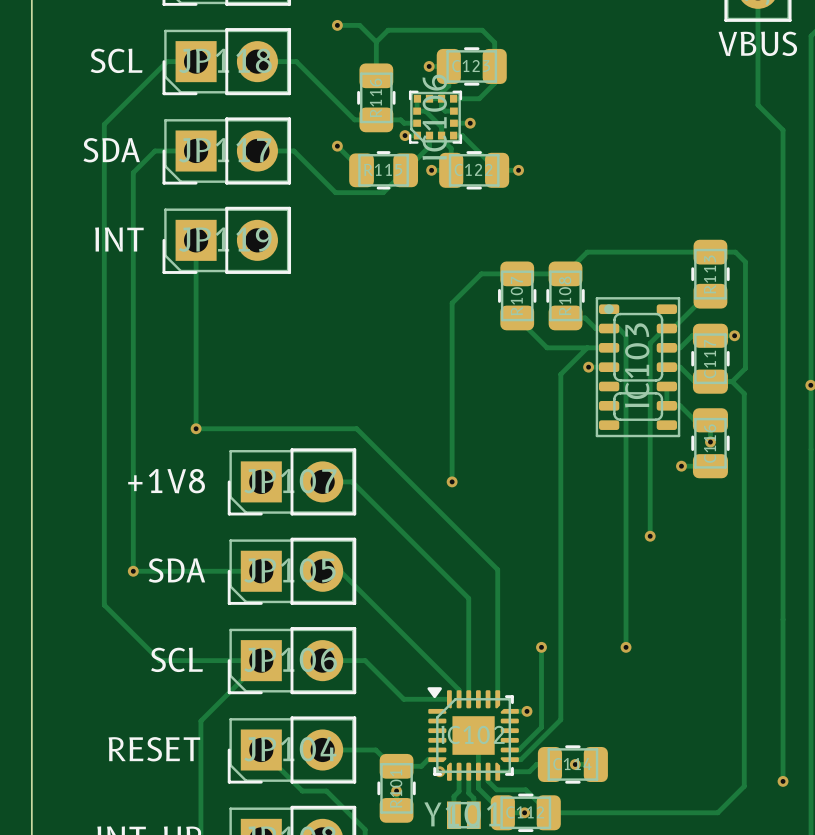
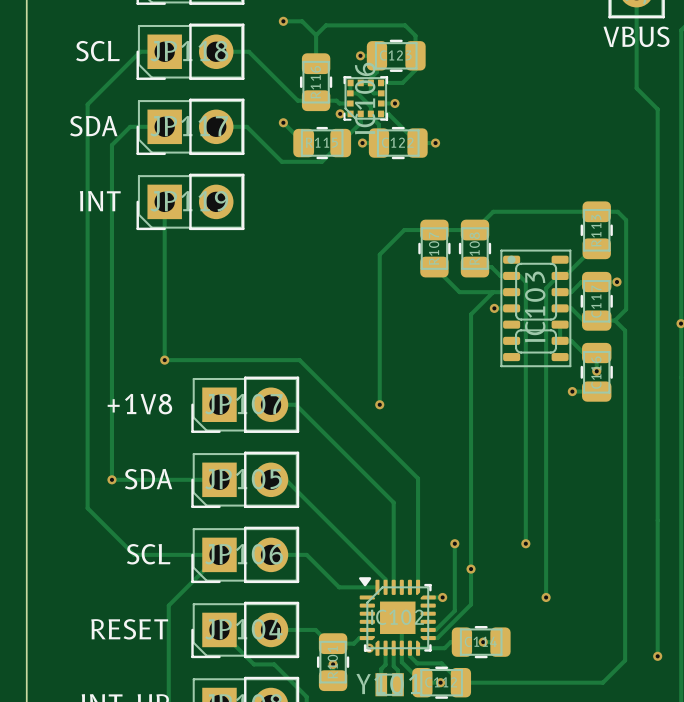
track: none -> (546, 450) (546, 597)
via: (650, 536) -> none
via: none -> (471, 569)
via: none -> (546, 597)

